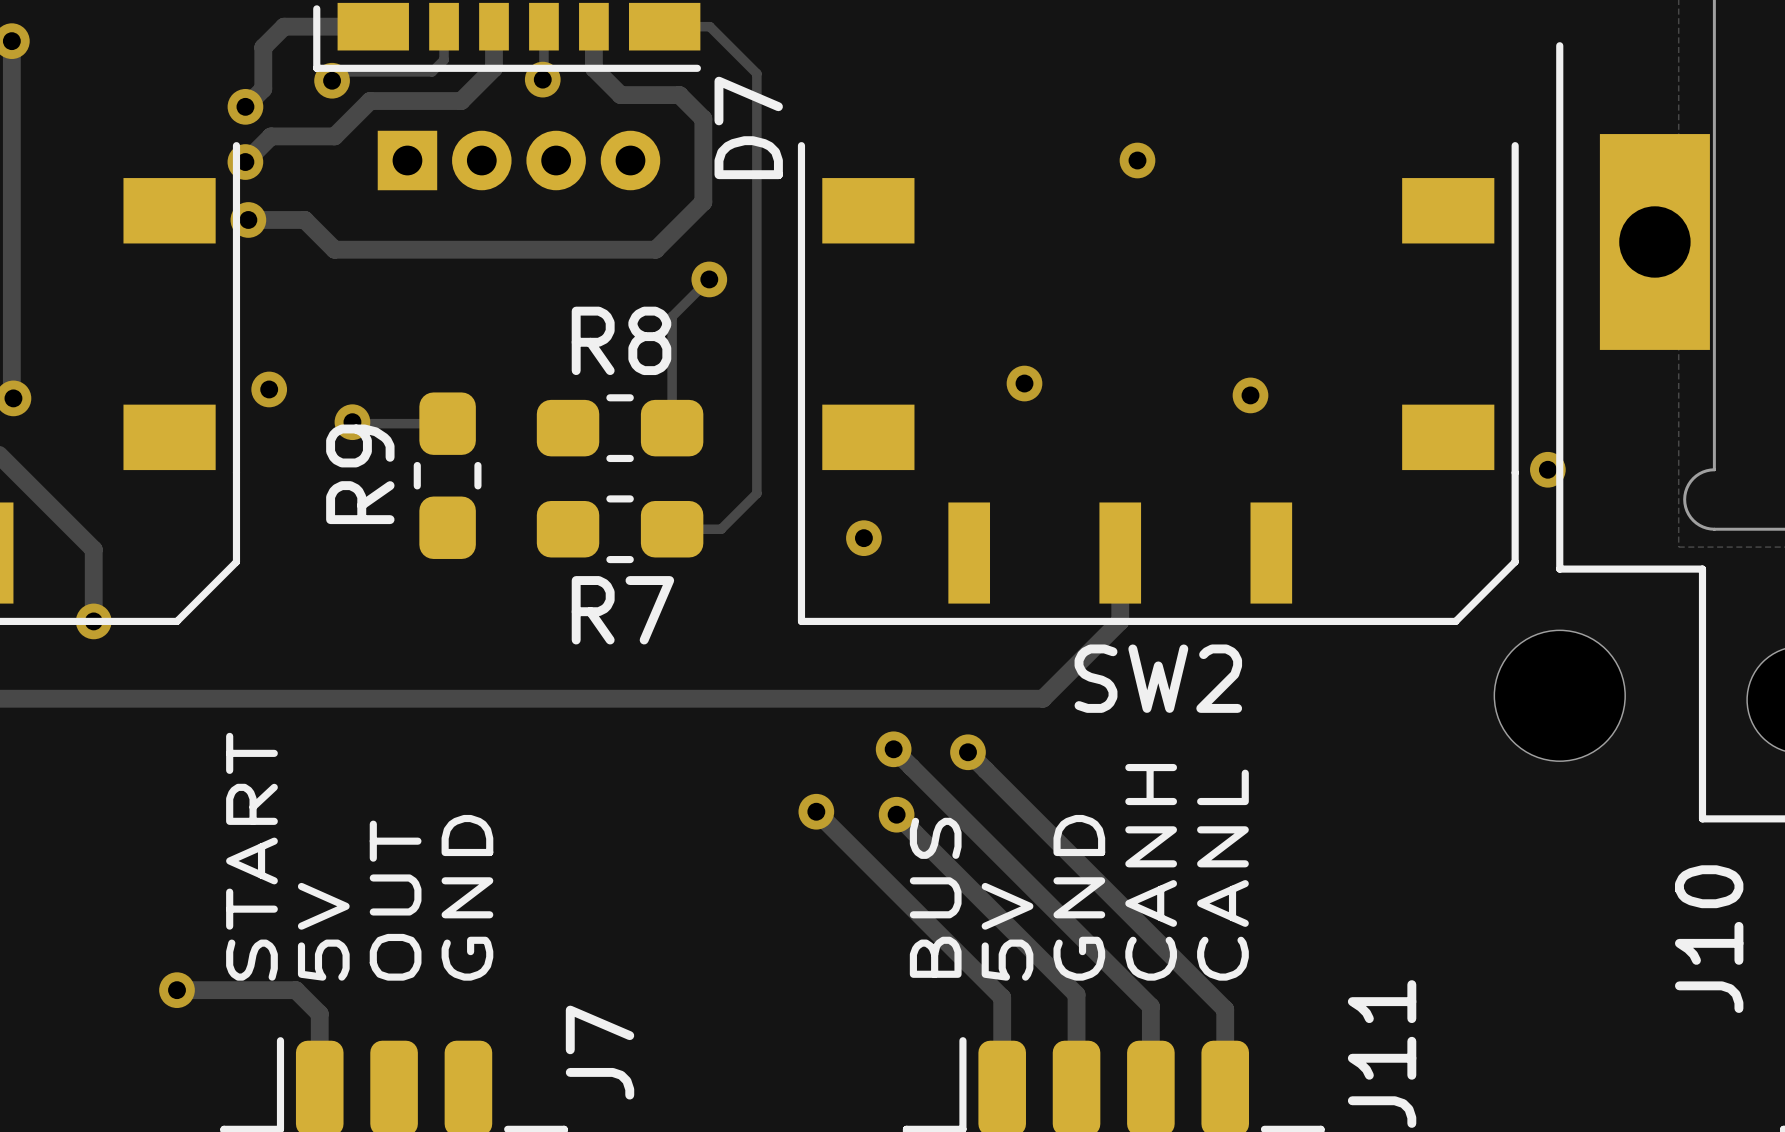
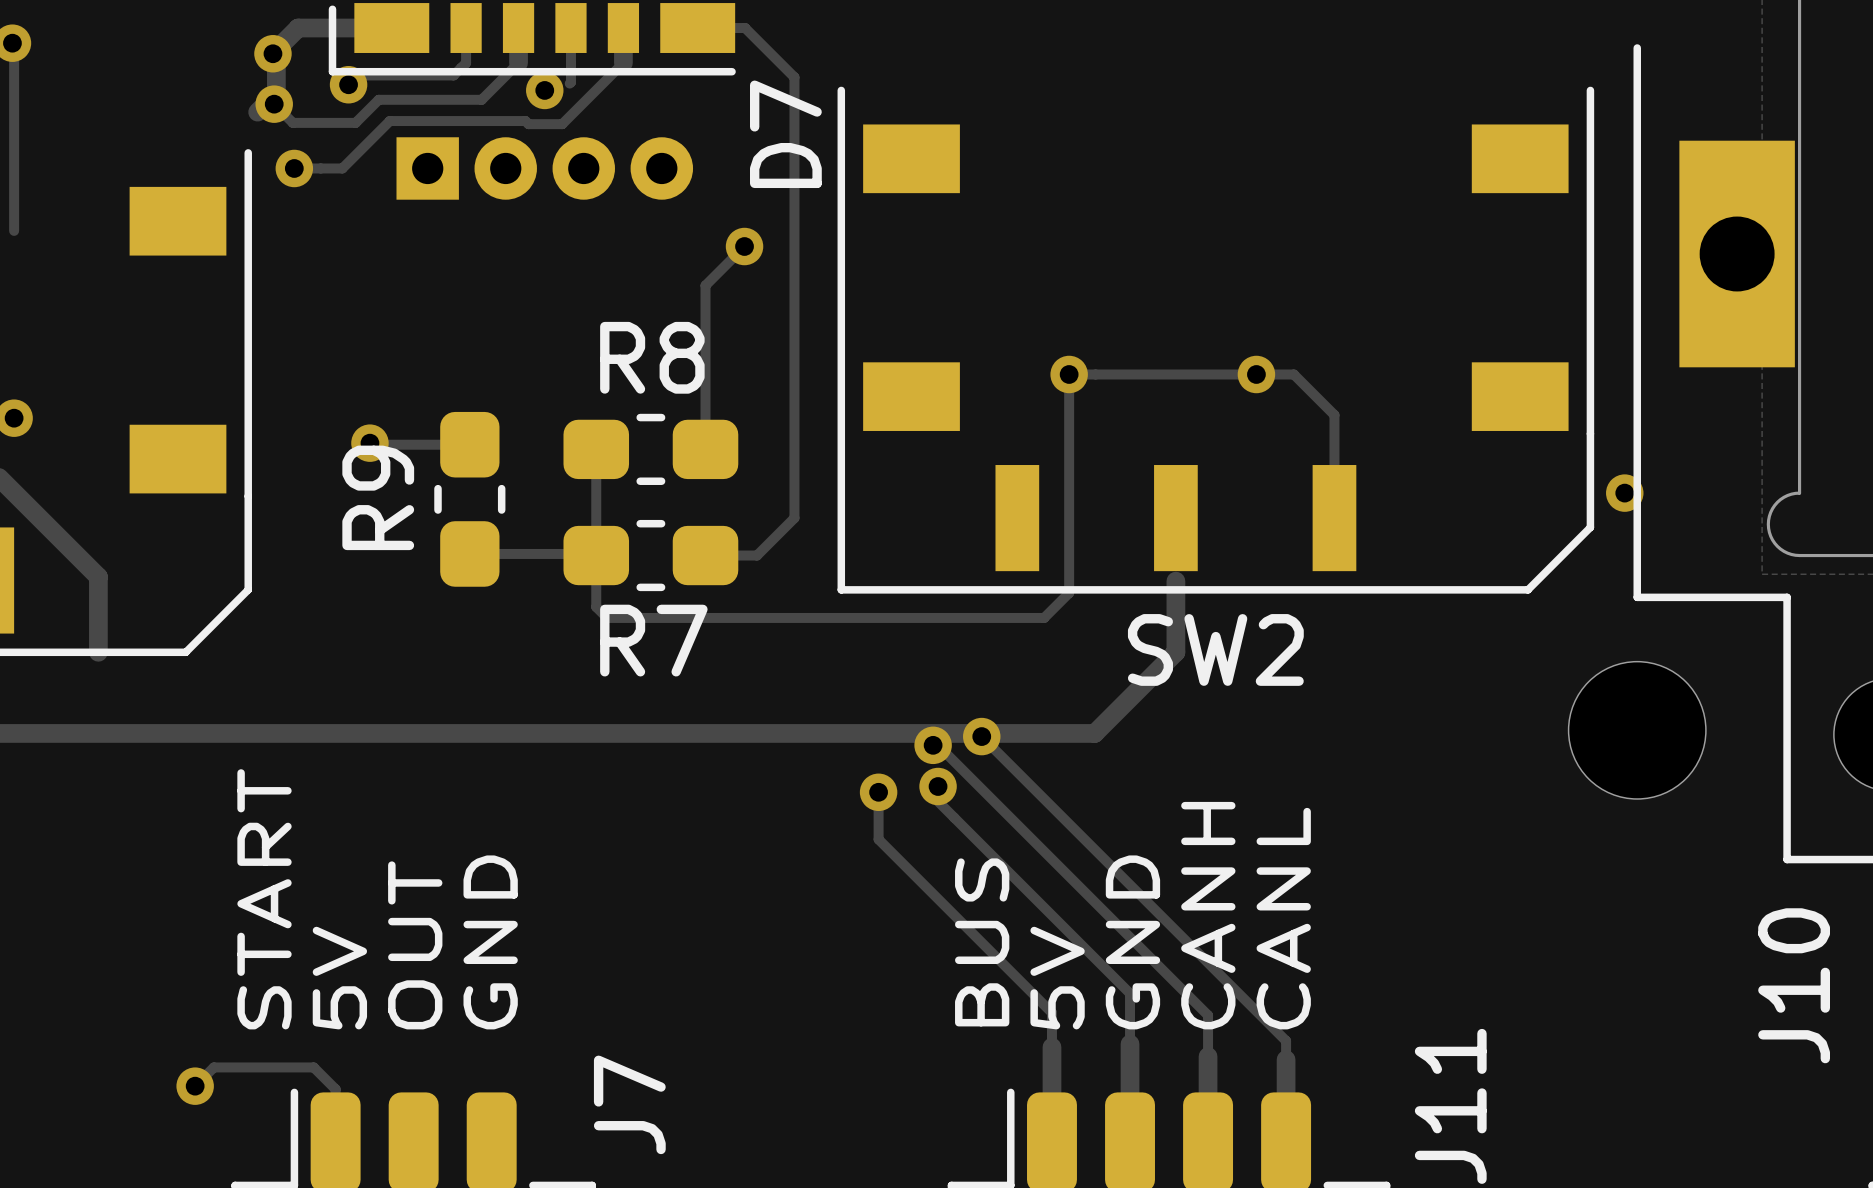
track: (11, 41) (11, 396) (13, 398) -> (14, 43) (14, 230)
via: none -> (272, 53)
track: (493, 59) (493, 68) (461, 101) (369, 101) (334, 136) (271, 136) (245, 162) -> (518, 62) (481, 99) (378, 99) (355, 122) (292, 122) (274, 104)
track: (593, 59) (593, 68) (620, 95) (679, 95) (703, 118) (703, 202) (655, 249) (334, 249) (304, 219) (248, 219) -> (623, 62) (562, 124) (528, 124) (525, 121) (389, 121) (342, 168) (294, 168)
via position: (542, 79) -> (544, 90)
via position: (245, 106) -> (274, 104)
via: (1137, 160) -> none
via position: (245, 162) -> (294, 168)
via: (248, 219) -> none
track: (709, 279) (672, 316) -> (744, 246) (705, 285) (705, 332)
via position: (709, 279) -> (744, 246)
via position: (1024, 383) -> (1069, 374)
SW2 position: (1158, 383) -> (1215, 340)
via: (269, 389) -> none
via position: (1250, 395) -> (1256, 374)
track: none -> (596, 449) (596, 607) (607, 617) (1044, 617) (1069, 592) (1069, 374) (1293, 374) (1334, 415) (1334, 518)
track: none -> (469, 553) (594, 553) (596, 555)
via: (863, 538) -> none
via: (93, 621) -> none
via: none -> (981, 736)
via: none -> (933, 745)
track: (893, 749) (1150, 1006) -> (933, 745) (938, 745) (1208, 1015) (1208, 1056)
track: (968, 752) (1225, 1009) -> (981, 736) (1286, 1040) (1286, 1059)
via: (968, 752) -> none
via: none -> (878, 792)
track: (816, 811) (1002, 997) -> (878, 792) (878, 839) (1051, 1012) (1051, 1047)
via: (816, 811) -> none
track: (896, 814) (1076, 994) -> (935, 799) (1130, 993) (1130, 1044)
via: (896, 814) -> none
via position: (177, 990) -> (195, 1086)
track: (182, 990) (295, 990) (319, 1013) (319, 1037) -> (195, 1086) (213, 1067) (313, 1067) (335, 1089)

